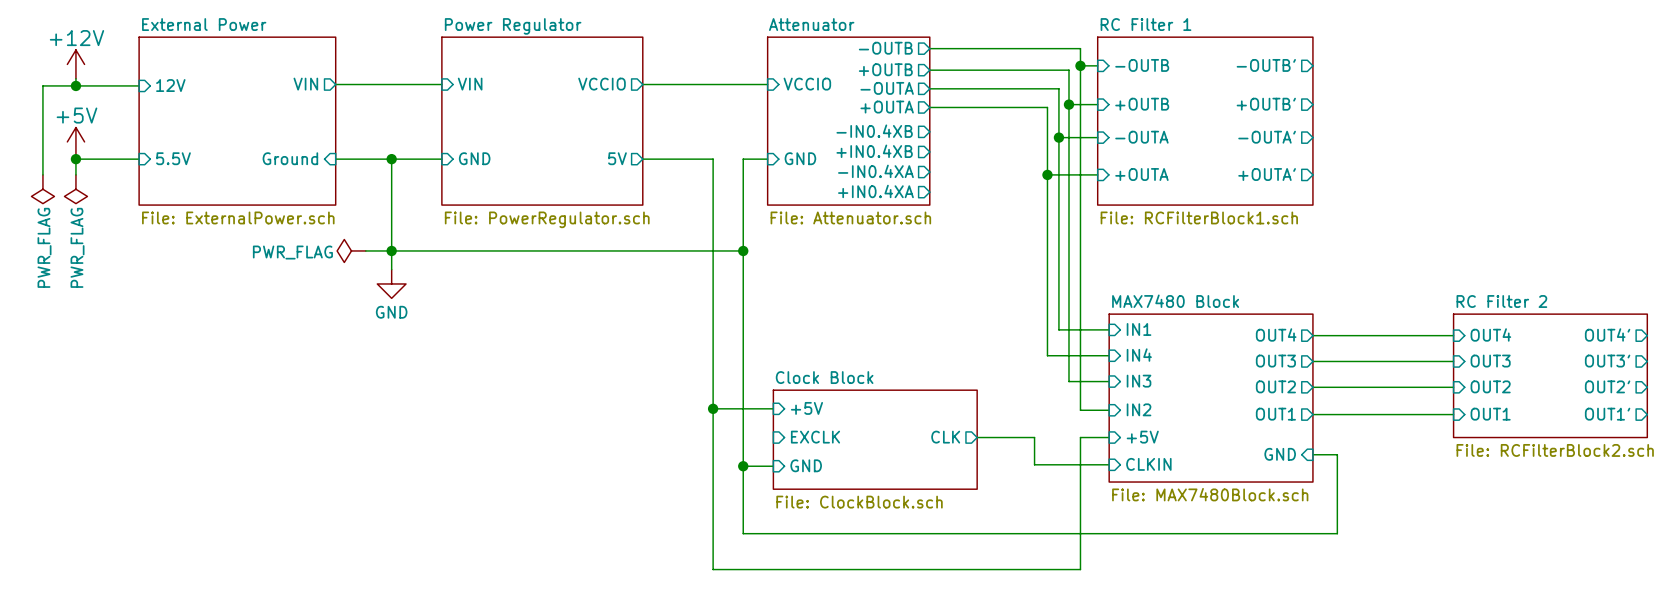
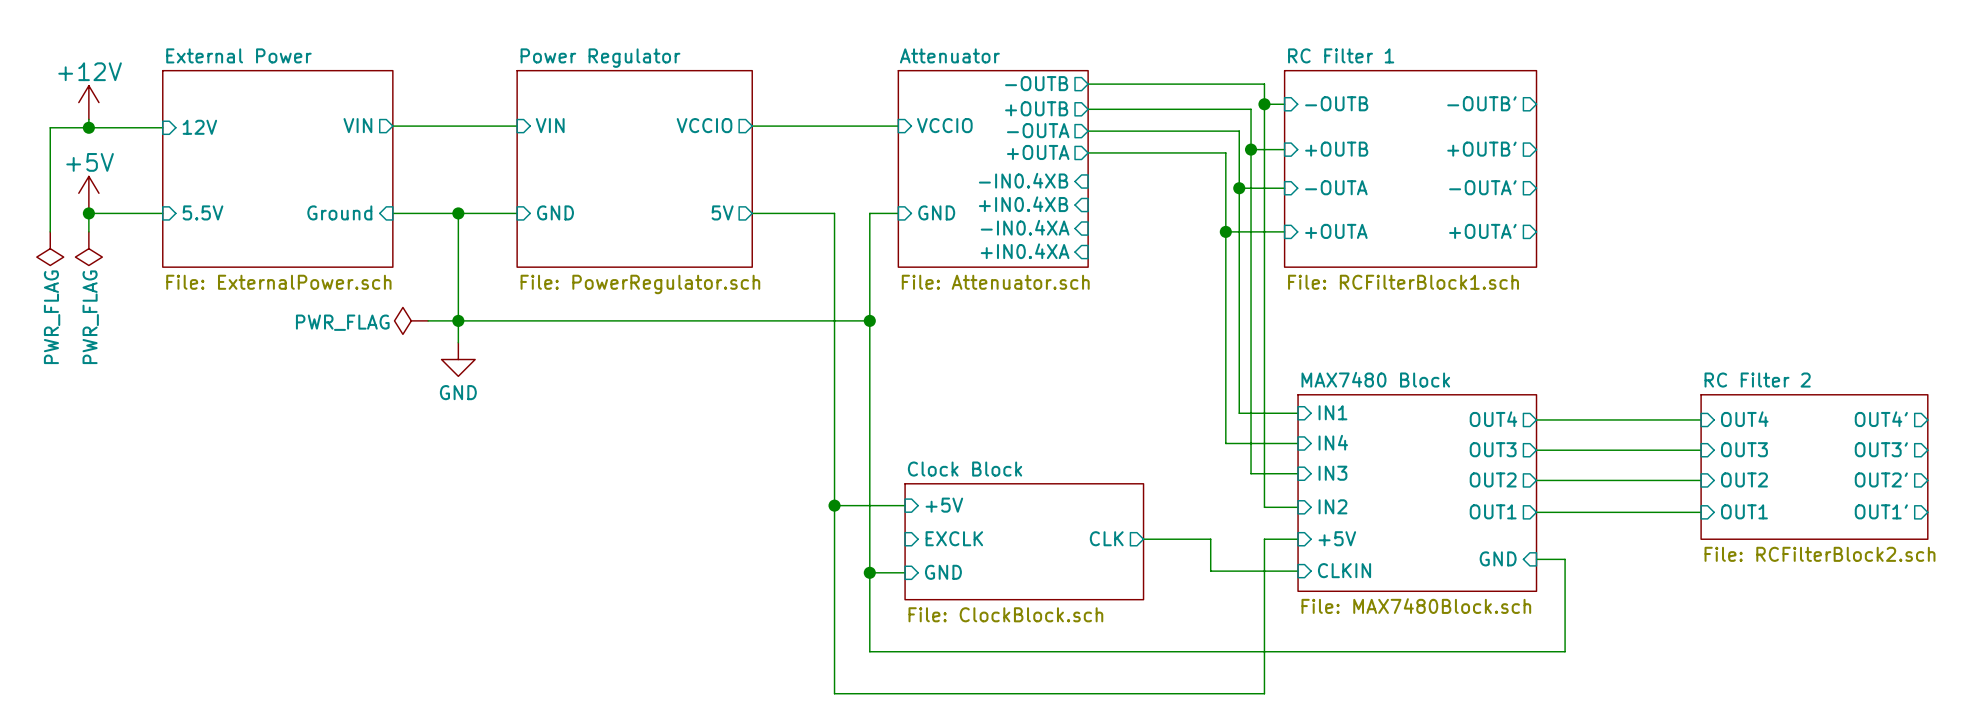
sheet pin shape: output (874, 131) -> input (1023, 180)
sheet pin shape: output (874, 151) -> input (1023, 204)
sheet pin shape: output (875, 171) -> input (1025, 227)
sheet pin shape: output (875, 191) -> input (1025, 251)

